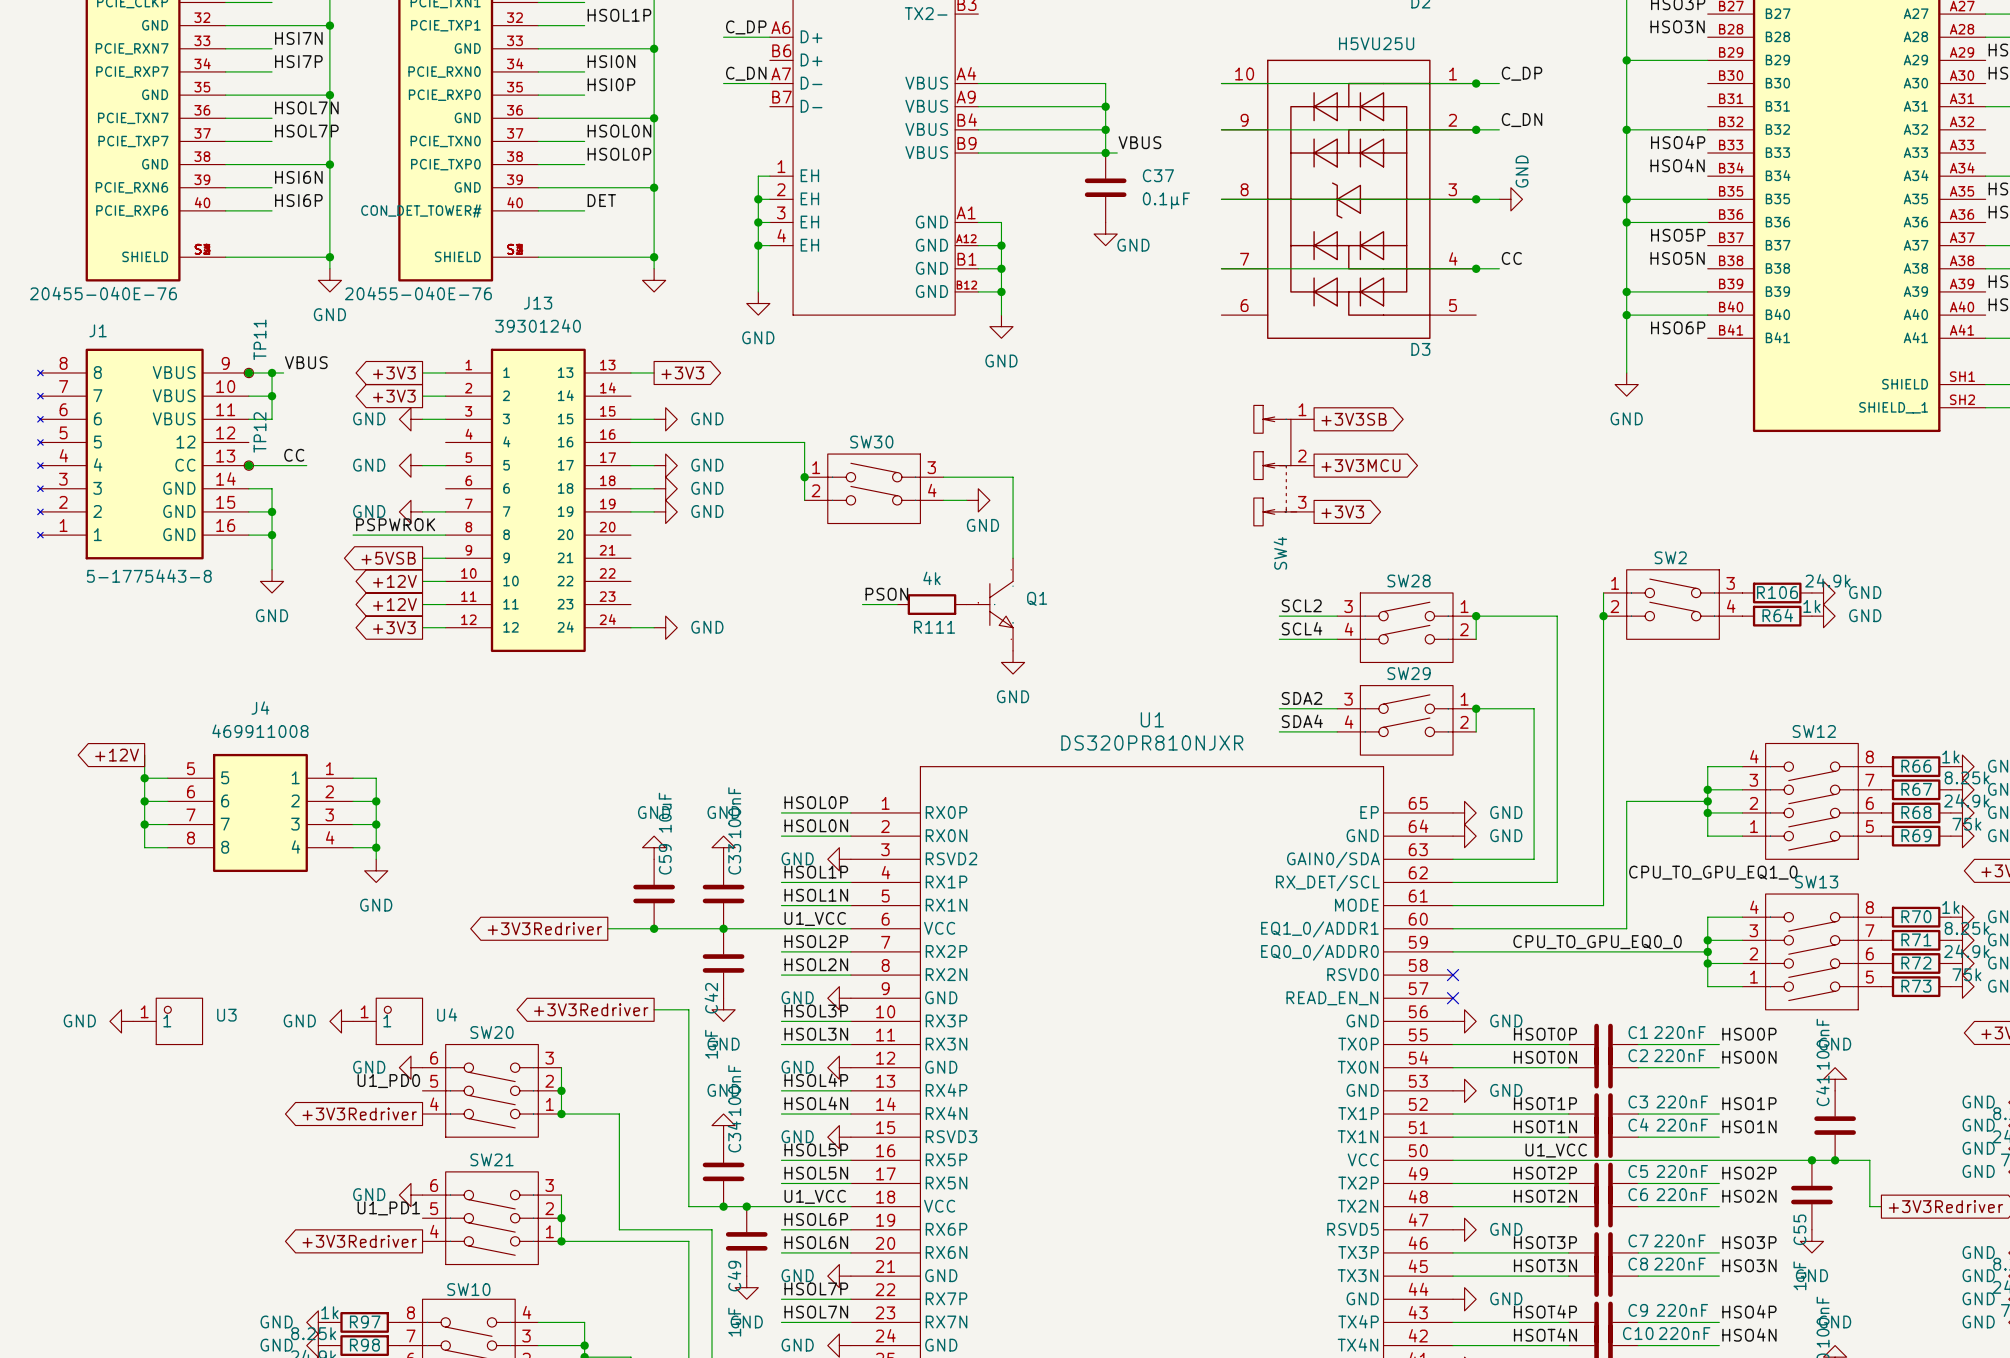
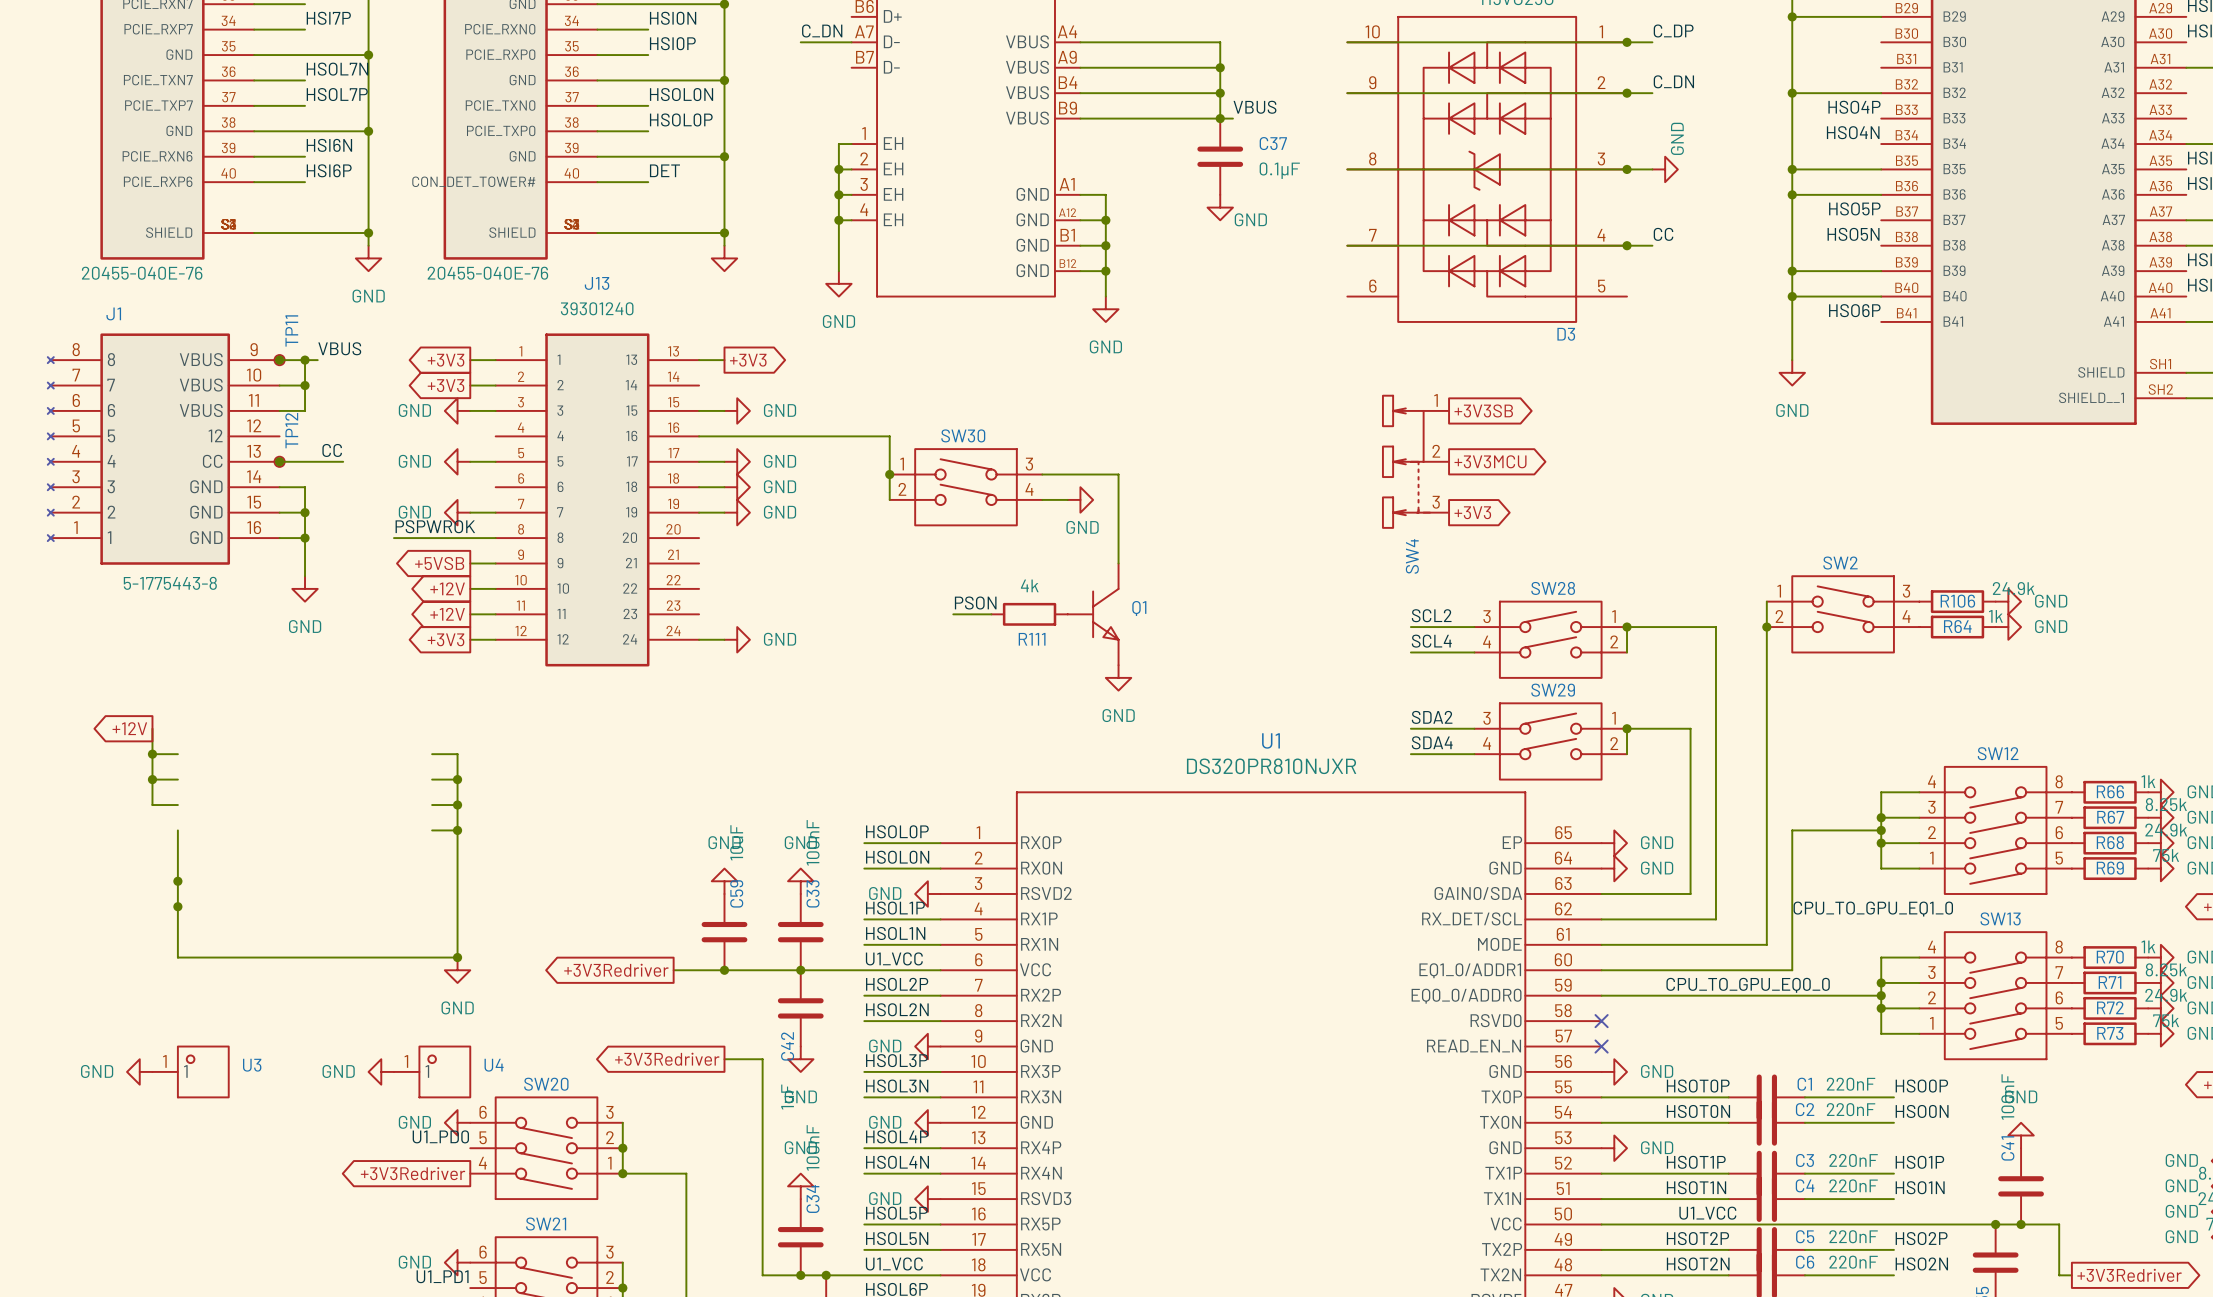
wire: none -> (152, 728) (152, 805) (165, 805)
junction: none -> (152, 754)
wire: none -> (432, 754) (457, 754) (457, 957) (177, 957) (177, 830)
global label position: +12V (117, 755) -> +12V (129, 728)
junction: none -> (152, 779)
wire: (144, 755) (144, 847) (167, 847) -> none
junction: none -> (457, 779)
junction: (144, 778) -> none
wire: (156, 778) (167, 778) -> none
wire: (353, 778) (376, 778) (376, 859) -> none
junction: none -> (457, 805)
wire: (144, 801) (167, 801) -> (152, 754) (177, 754)
junction: (144, 801) -> none
wire: (353, 801) (376, 801) -> (432, 779) (457, 779)
junction: (376, 801) -> none
junction: none -> (457, 830)
J4: 469911008 (260, 812) -> none
wire: (144, 824) (167, 824) -> (152, 779) (177, 779)
junction: (144, 824) -> none
wire: (353, 824) (376, 824) -> (432, 805) (457, 805)
junction: (376, 824) -> none
junction: none -> (177, 881)
wire: (353, 847) (376, 847) -> (432, 830) (457, 830)
junction: (376, 847) -> none
junction: none -> (177, 906)
power symbol position: GND (376, 870) -> GND (457, 970)
junction: none -> (457, 957)

